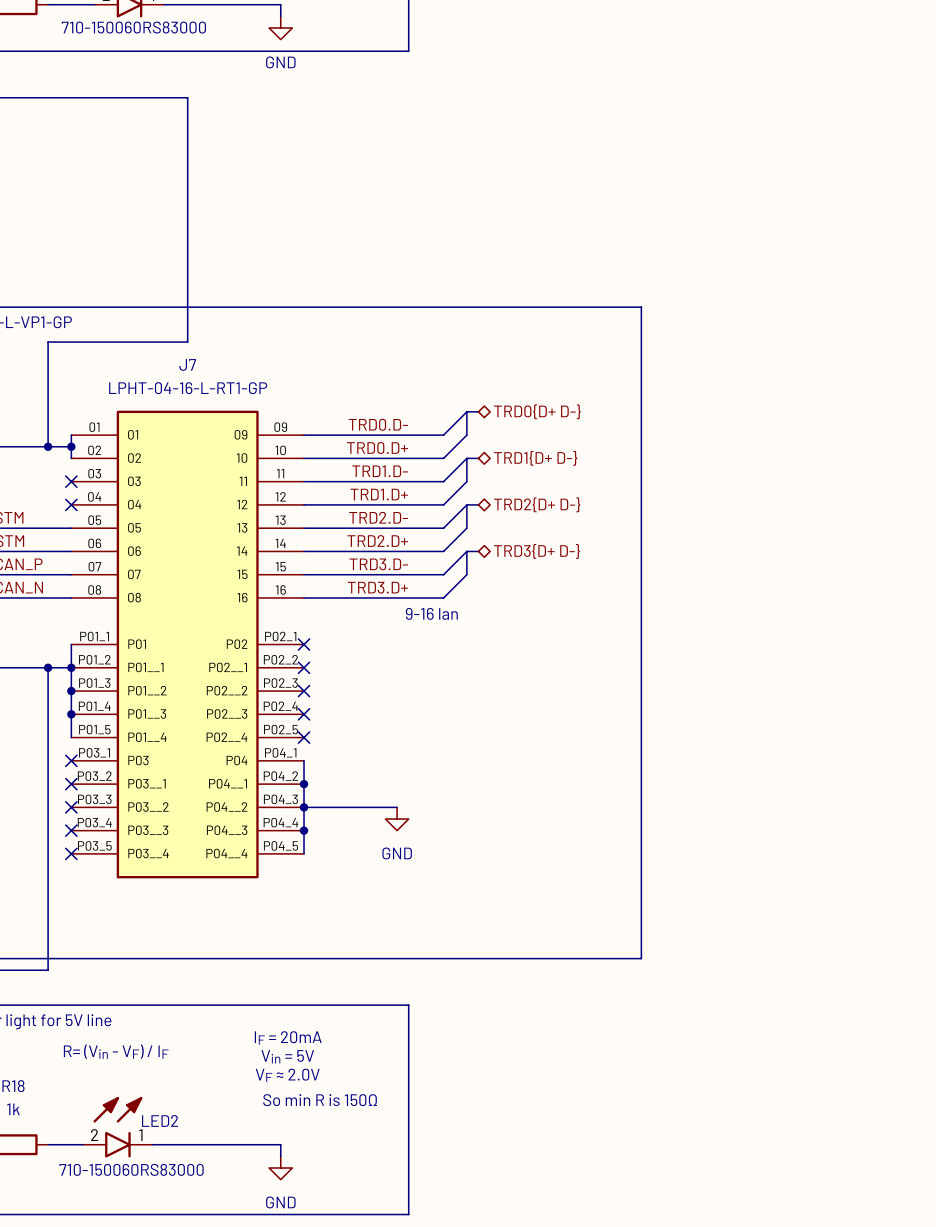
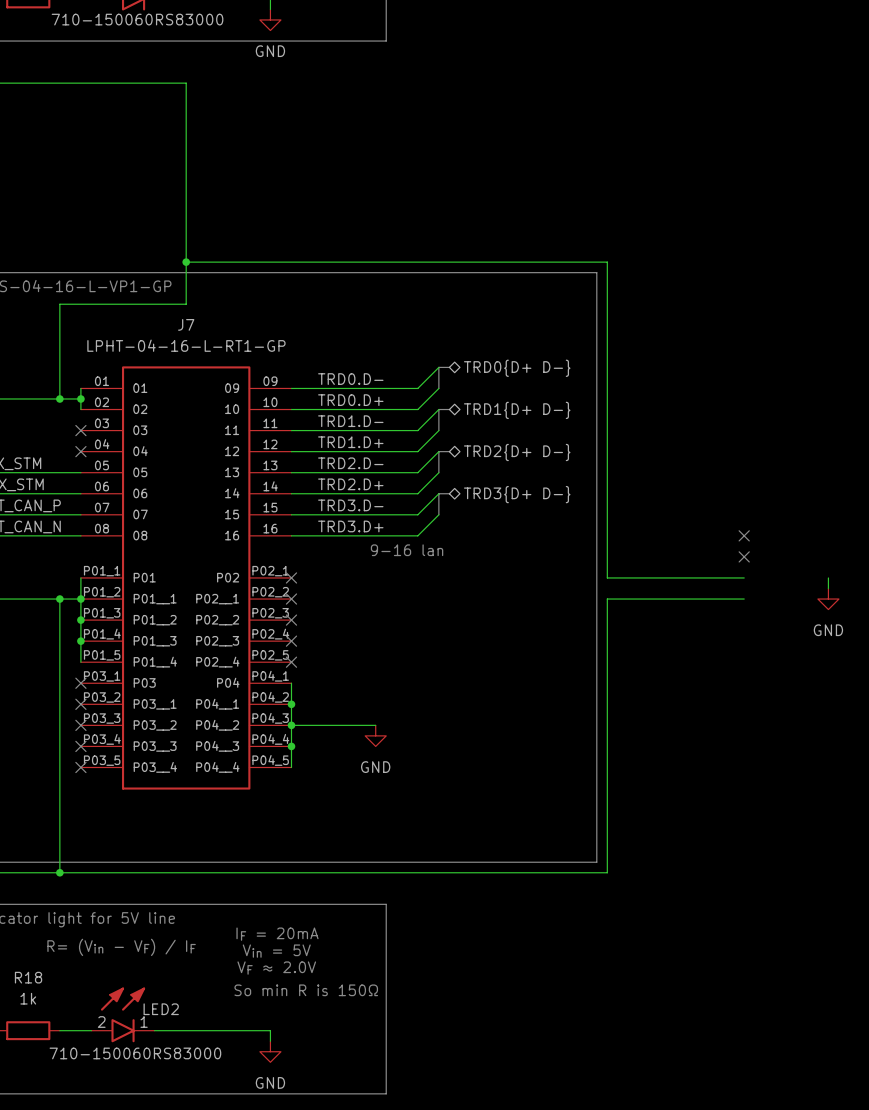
wire: none -> (186, 262) (607, 262) (607, 577) (744, 577)
junction: none -> (186, 262)
no-connect mark: none -> (744, 535)
no-connect mark: none -> (744, 556)
wire: none -> (828, 577) (828, 588)
wire: none -> (744, 599) (607, 599) (607, 872) (59, 872)
power symbol: none -> GND (828, 599)
junction: none -> (59, 872)

